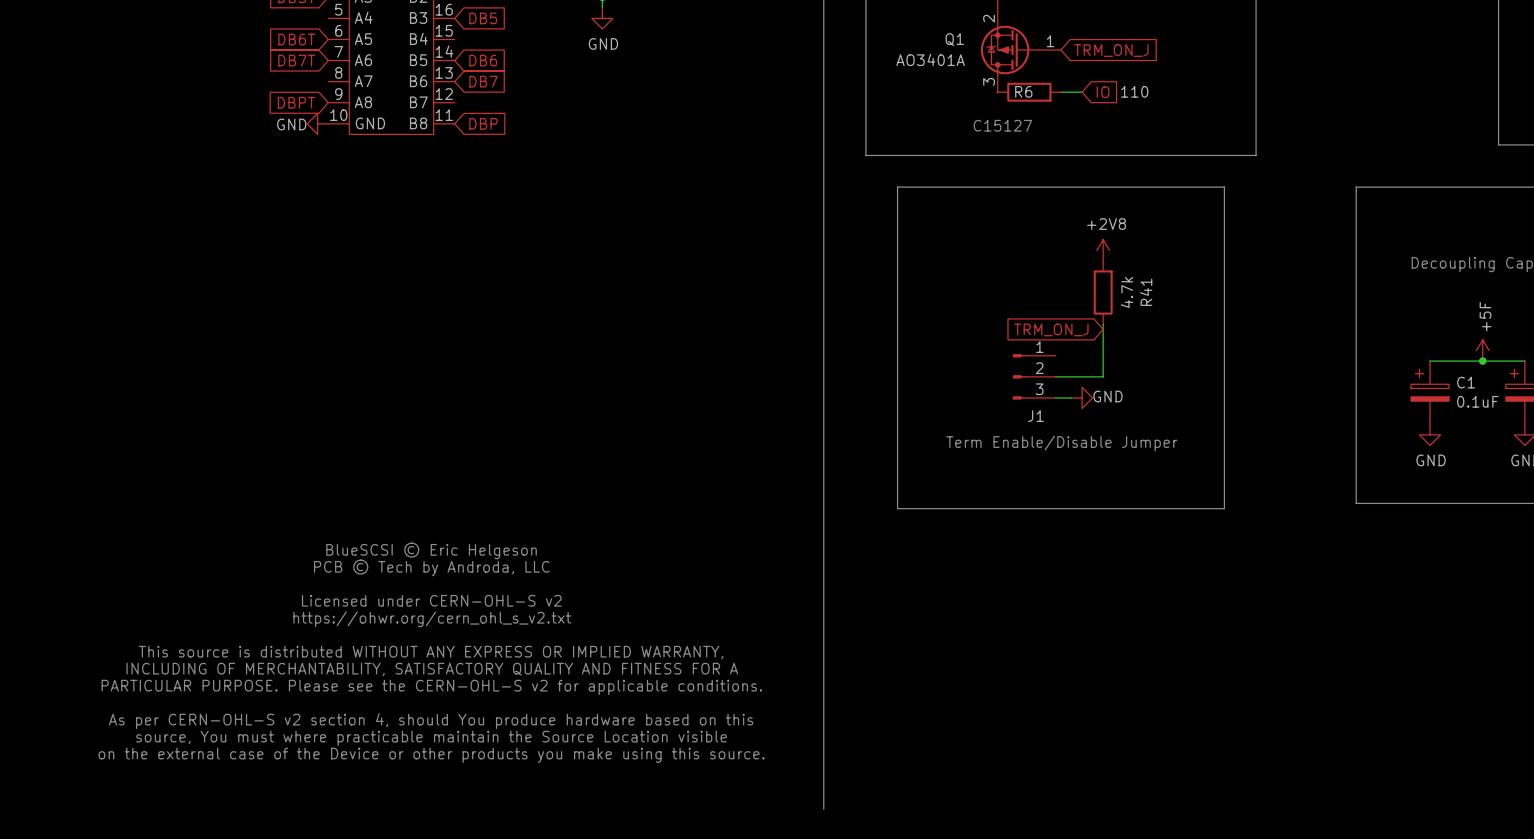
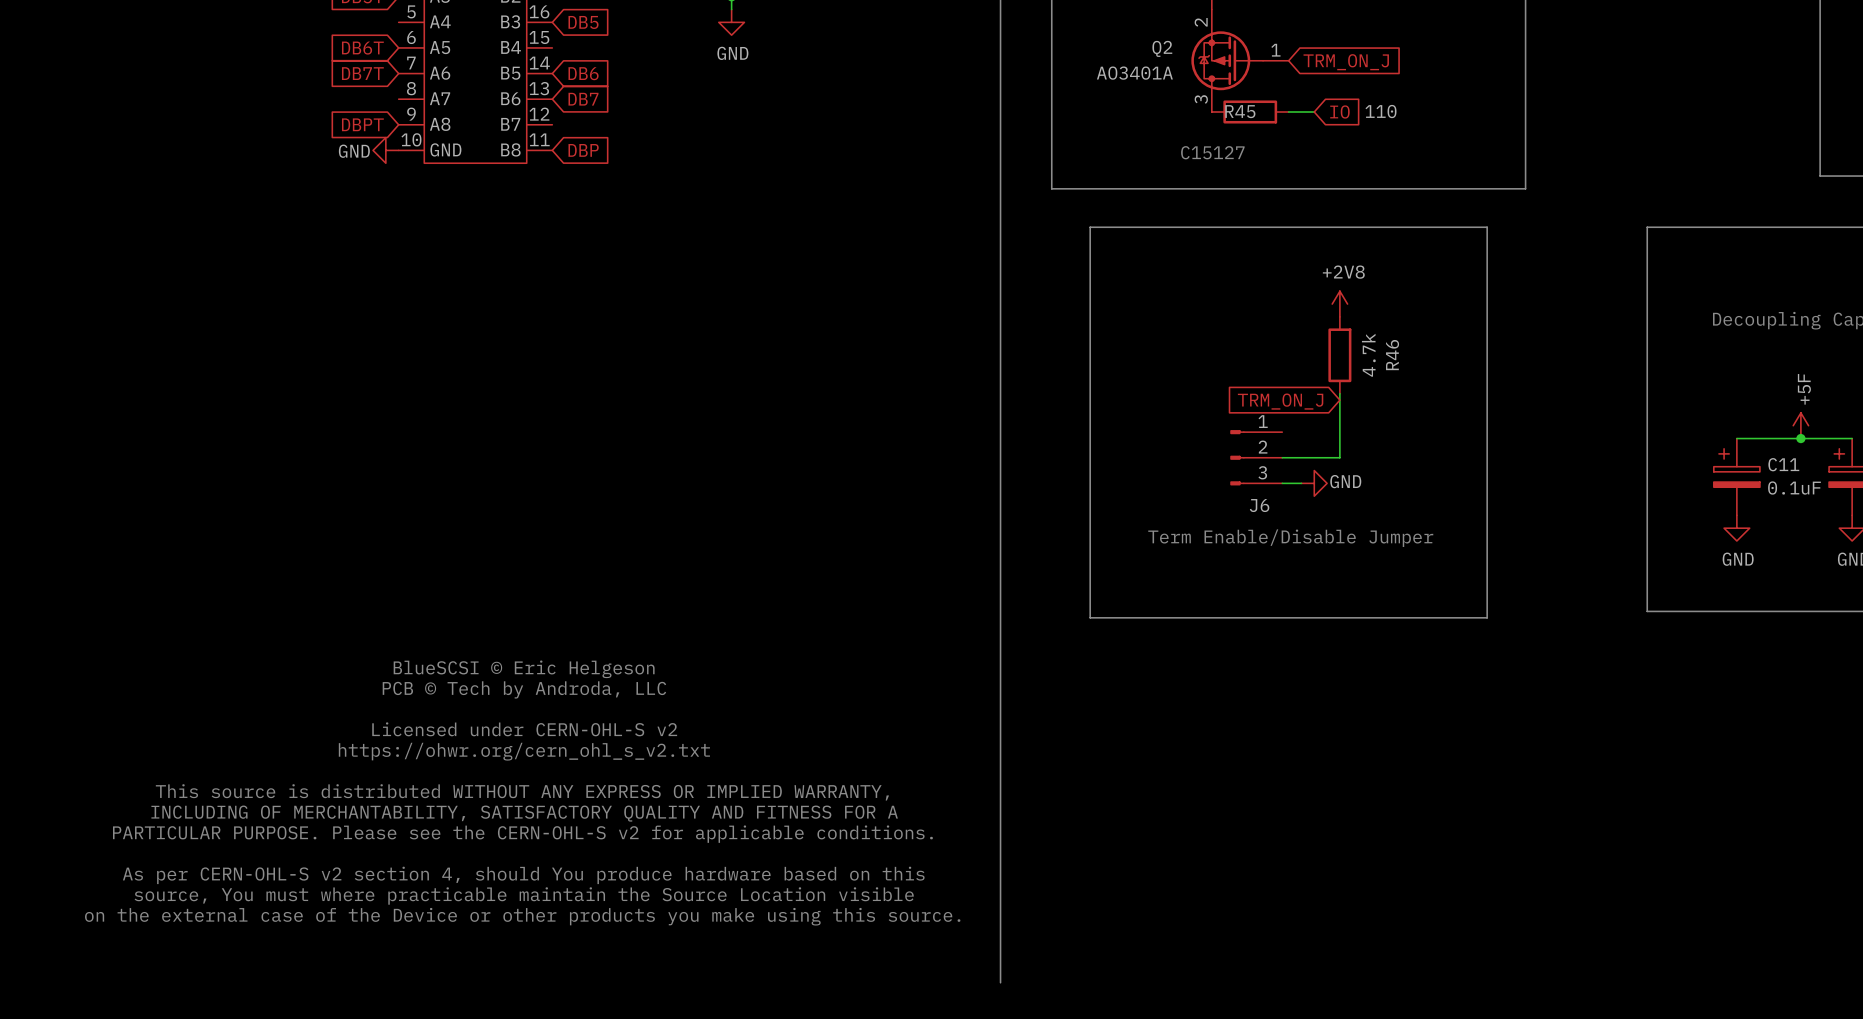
Q1 name: Q1 (954, 39) -> Q2 (1162, 48)
R6 name: R6 (1023, 91) -> R45 (1240, 111)
R41 name: R41 (1146, 292) -> R46 (1392, 355)
C1 name: C1 (1466, 382) -> C11 (1783, 464)
J1 name: J1 (1035, 416) -> J6 (1259, 505)

